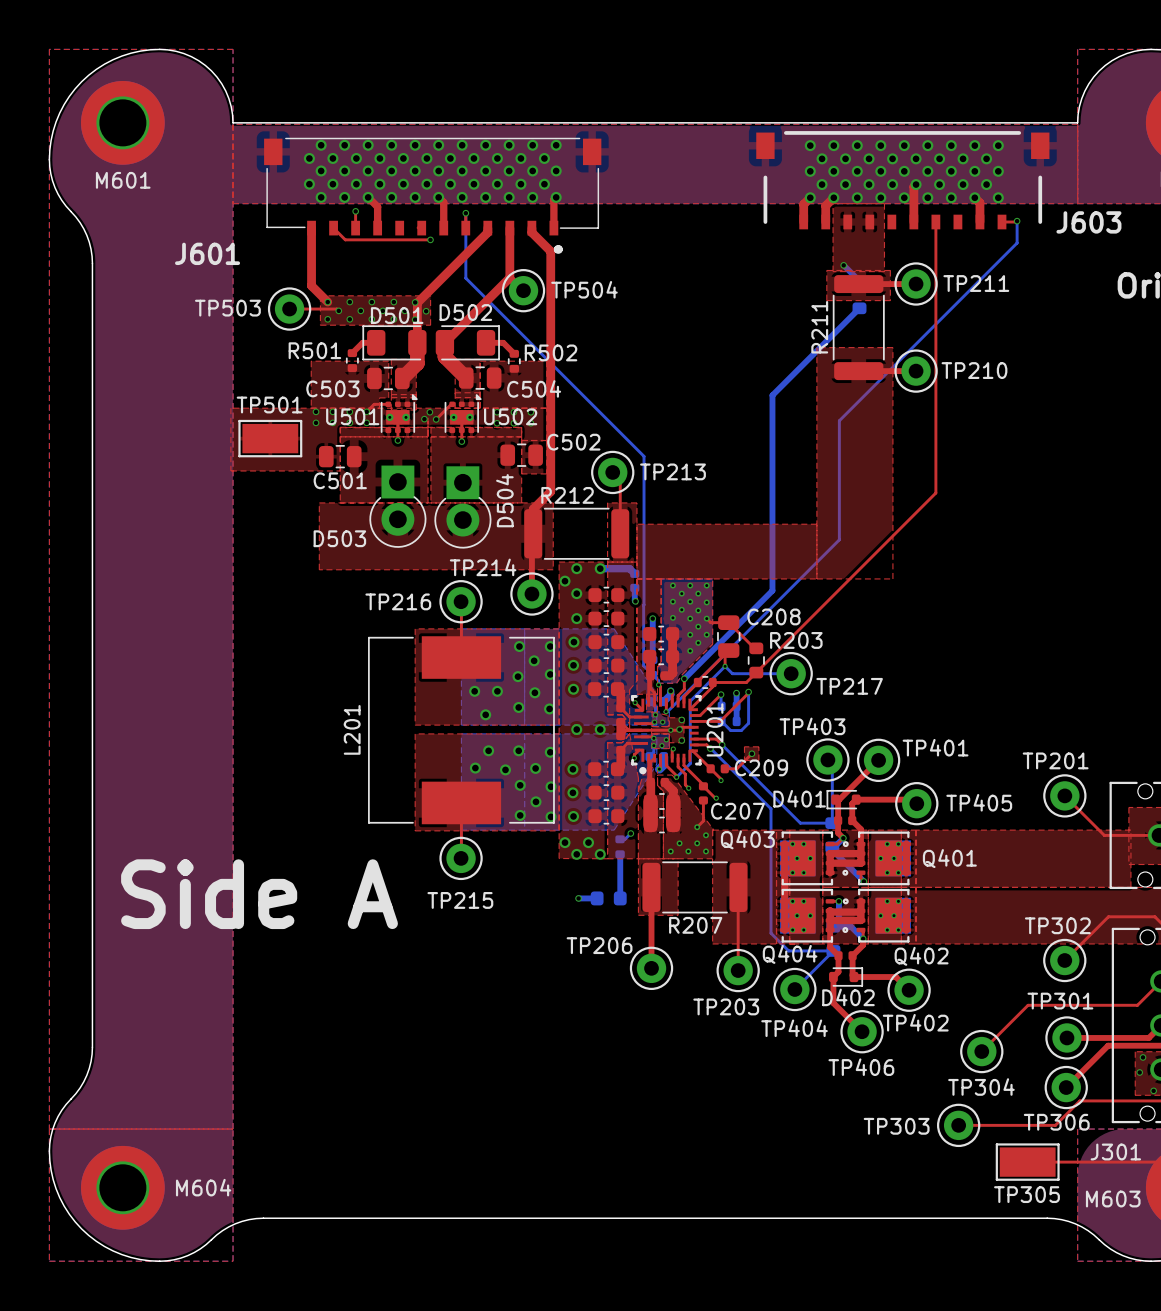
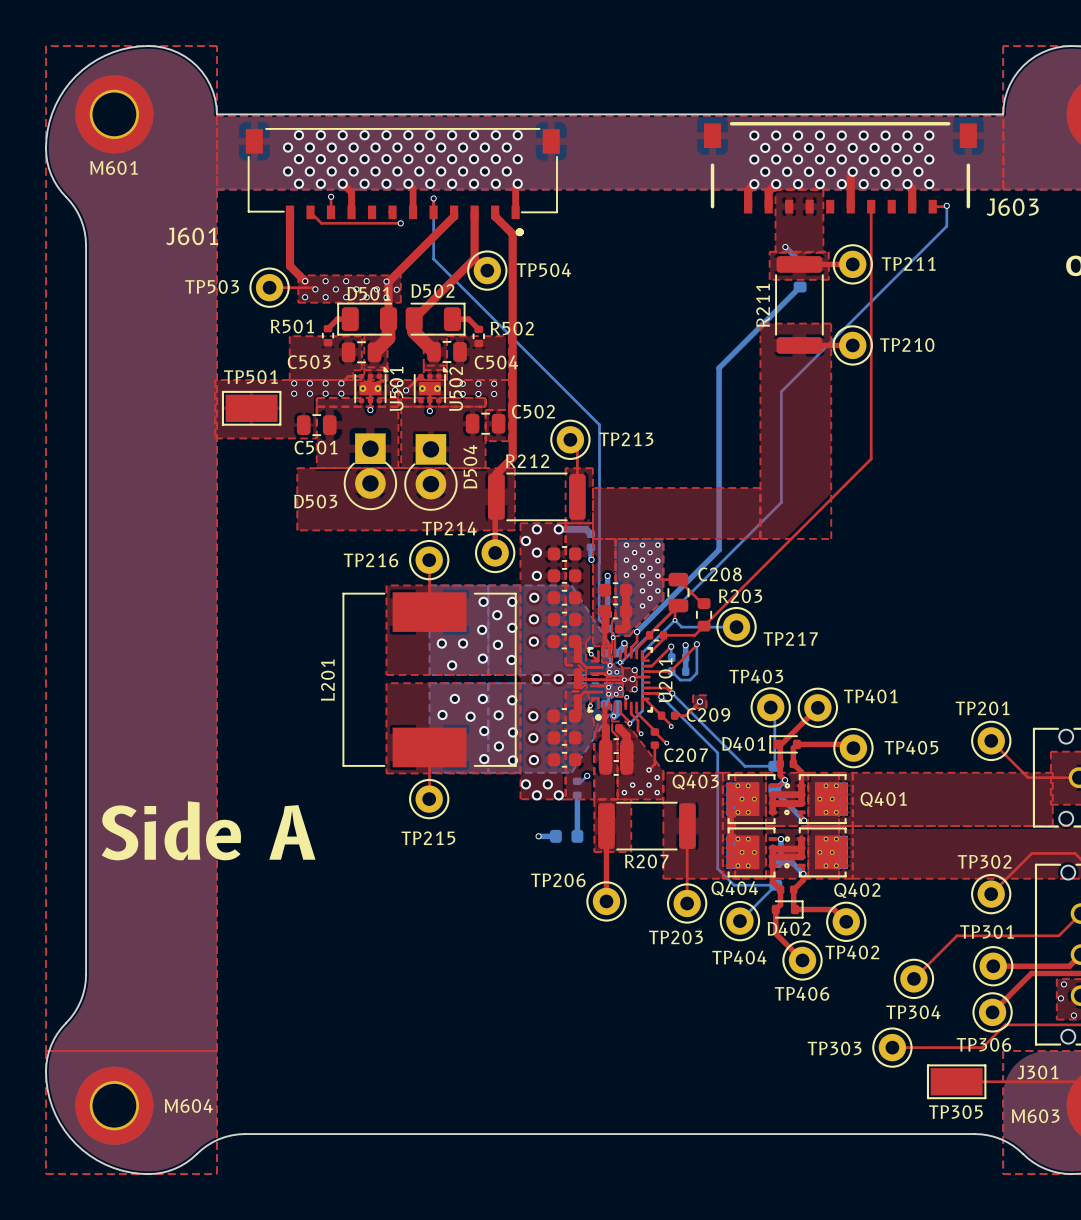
U501 name rotation: 0° (352, 416) -> 90° counterclockwise (396, 388)
U501 name position: U501 (352, 416) -> U501 (396, 388)
U502 name rotation: 0° (510, 416) -> 90° counterclockwise (456, 388)

